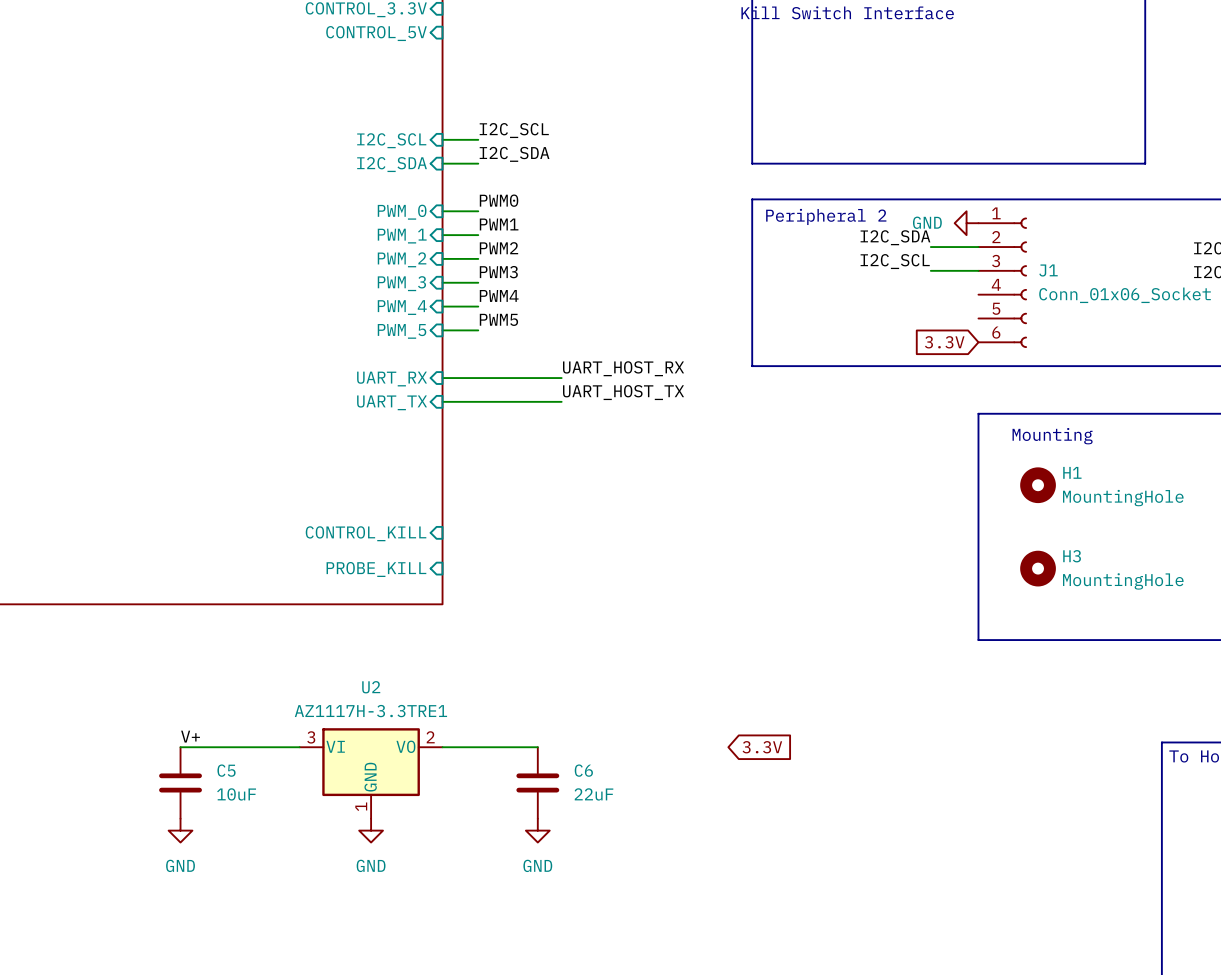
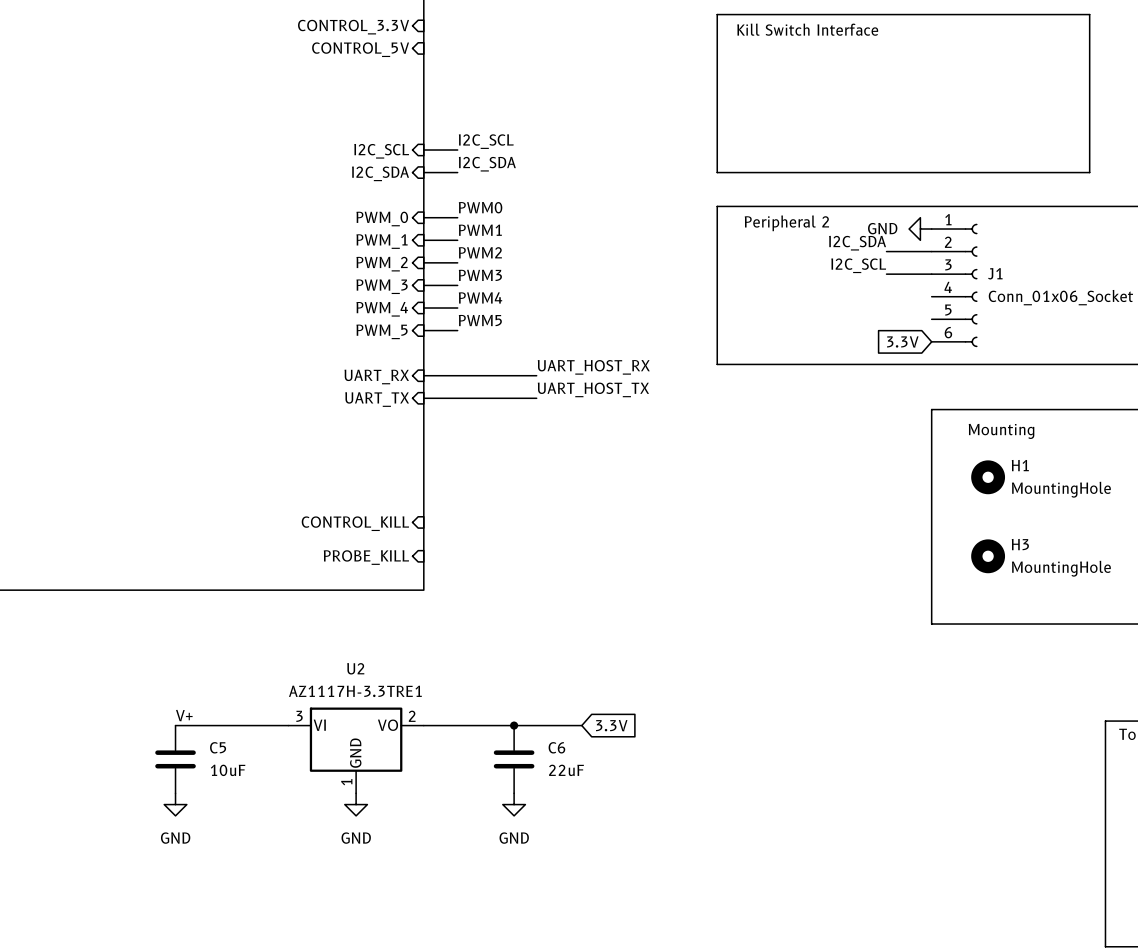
wire: none -> (514, 725) (581, 725)
junction: none -> (514, 725)
global label position: 3.3V (762, 747) -> 3.3V (611, 725)

